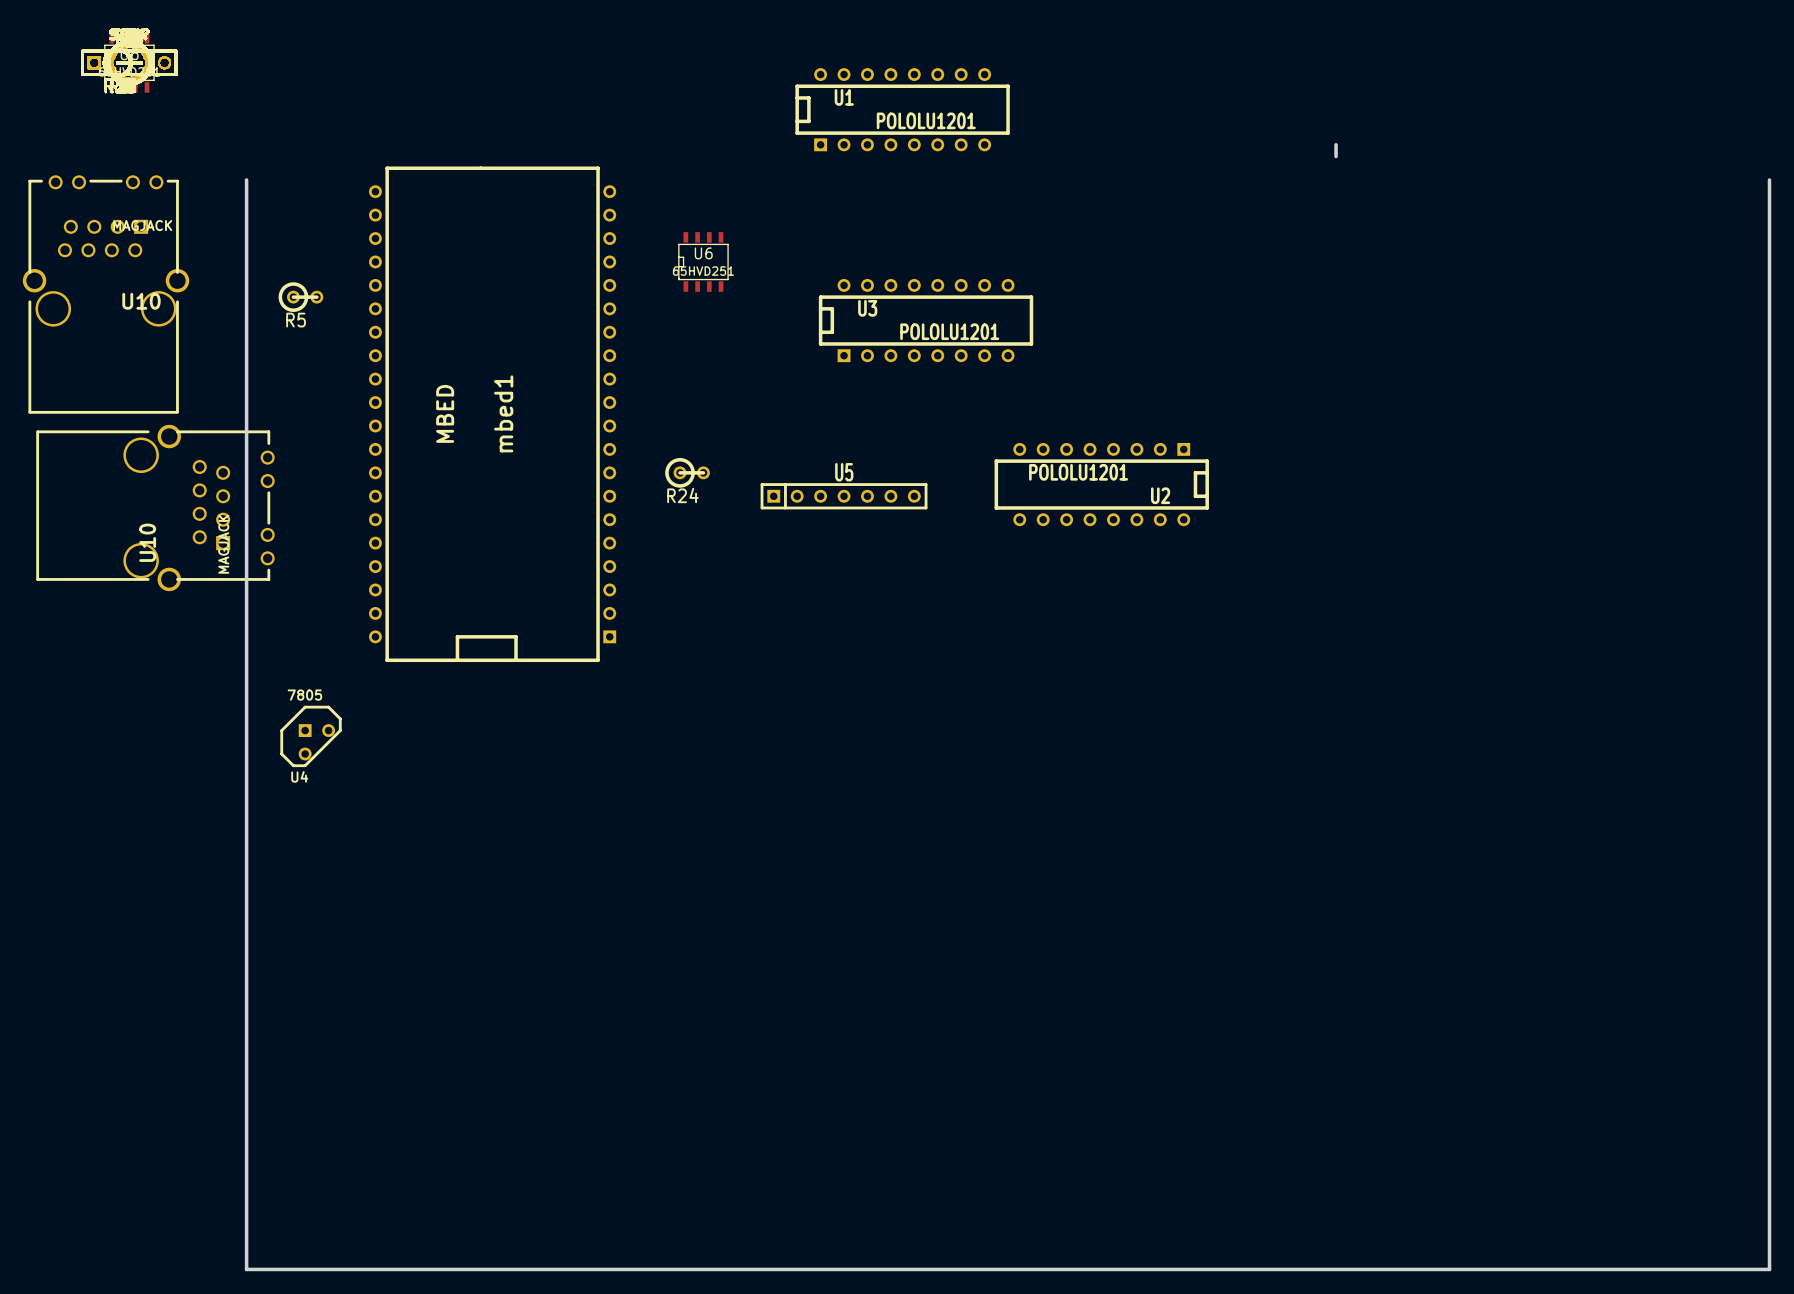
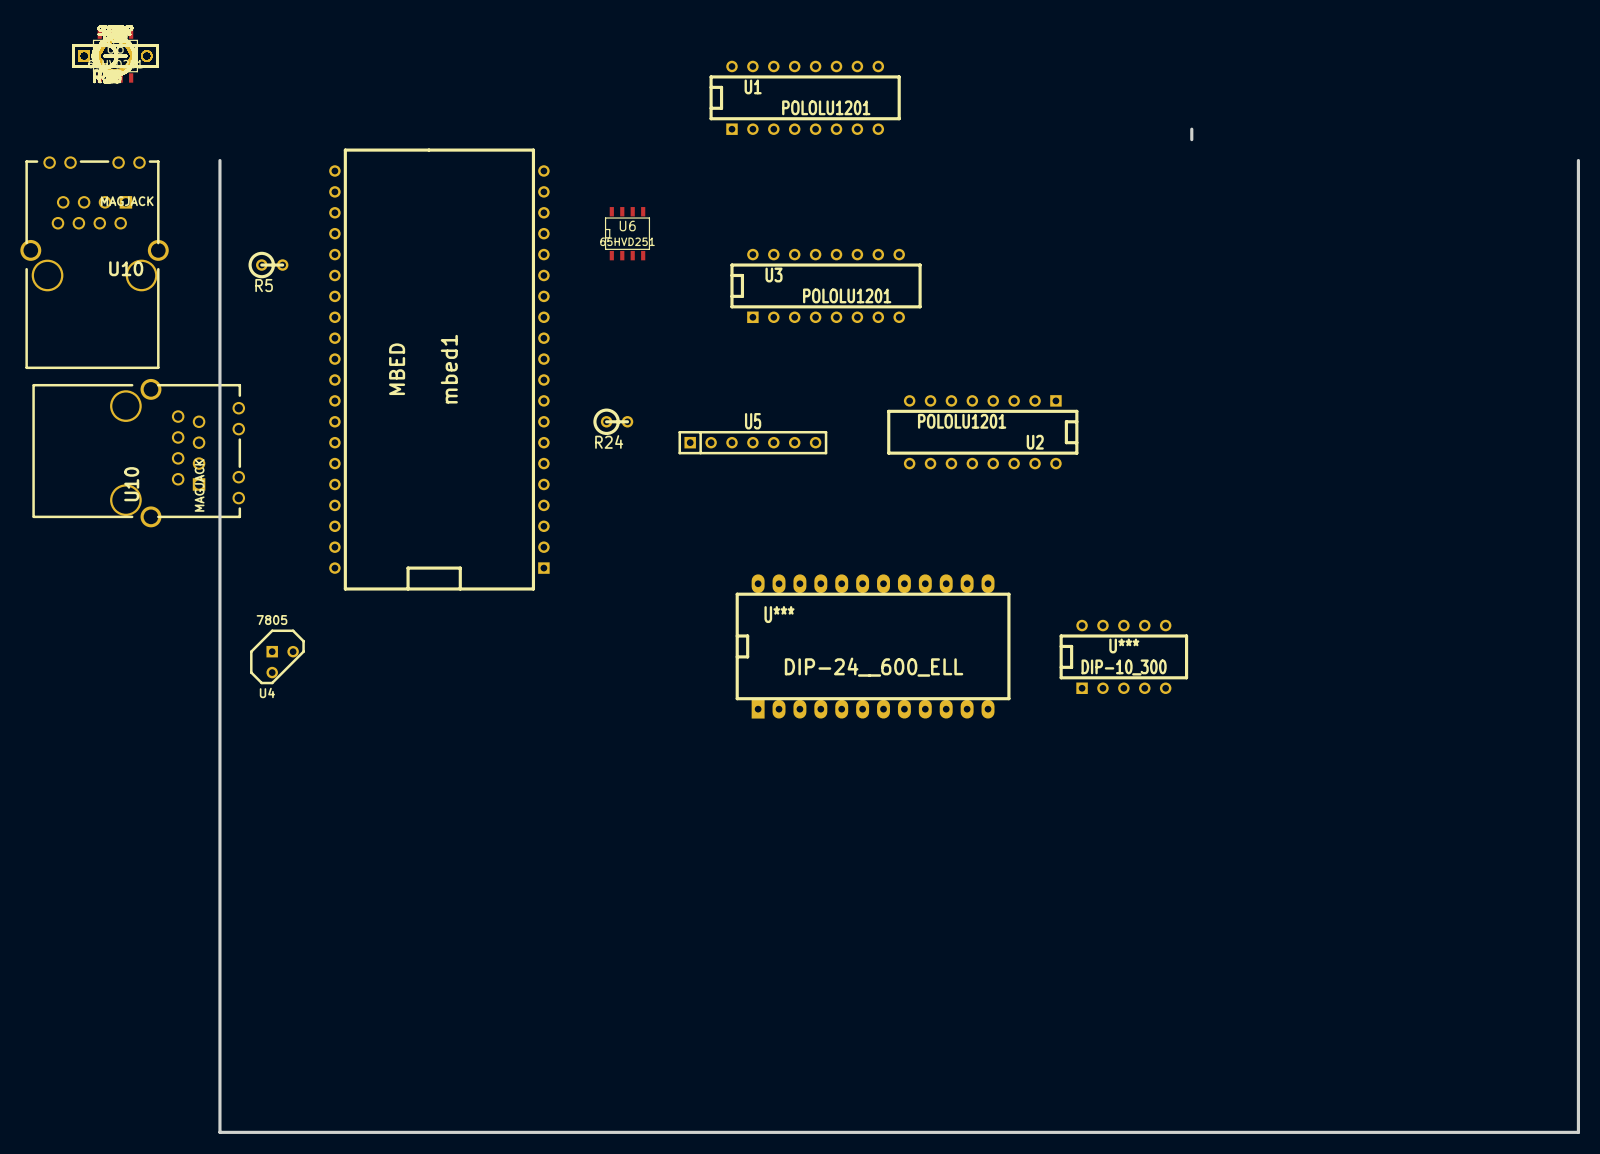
U***: none -> DIP-24__600_ELL (873, 646)
U***: none -> DIP-10_300 (1123, 656)

